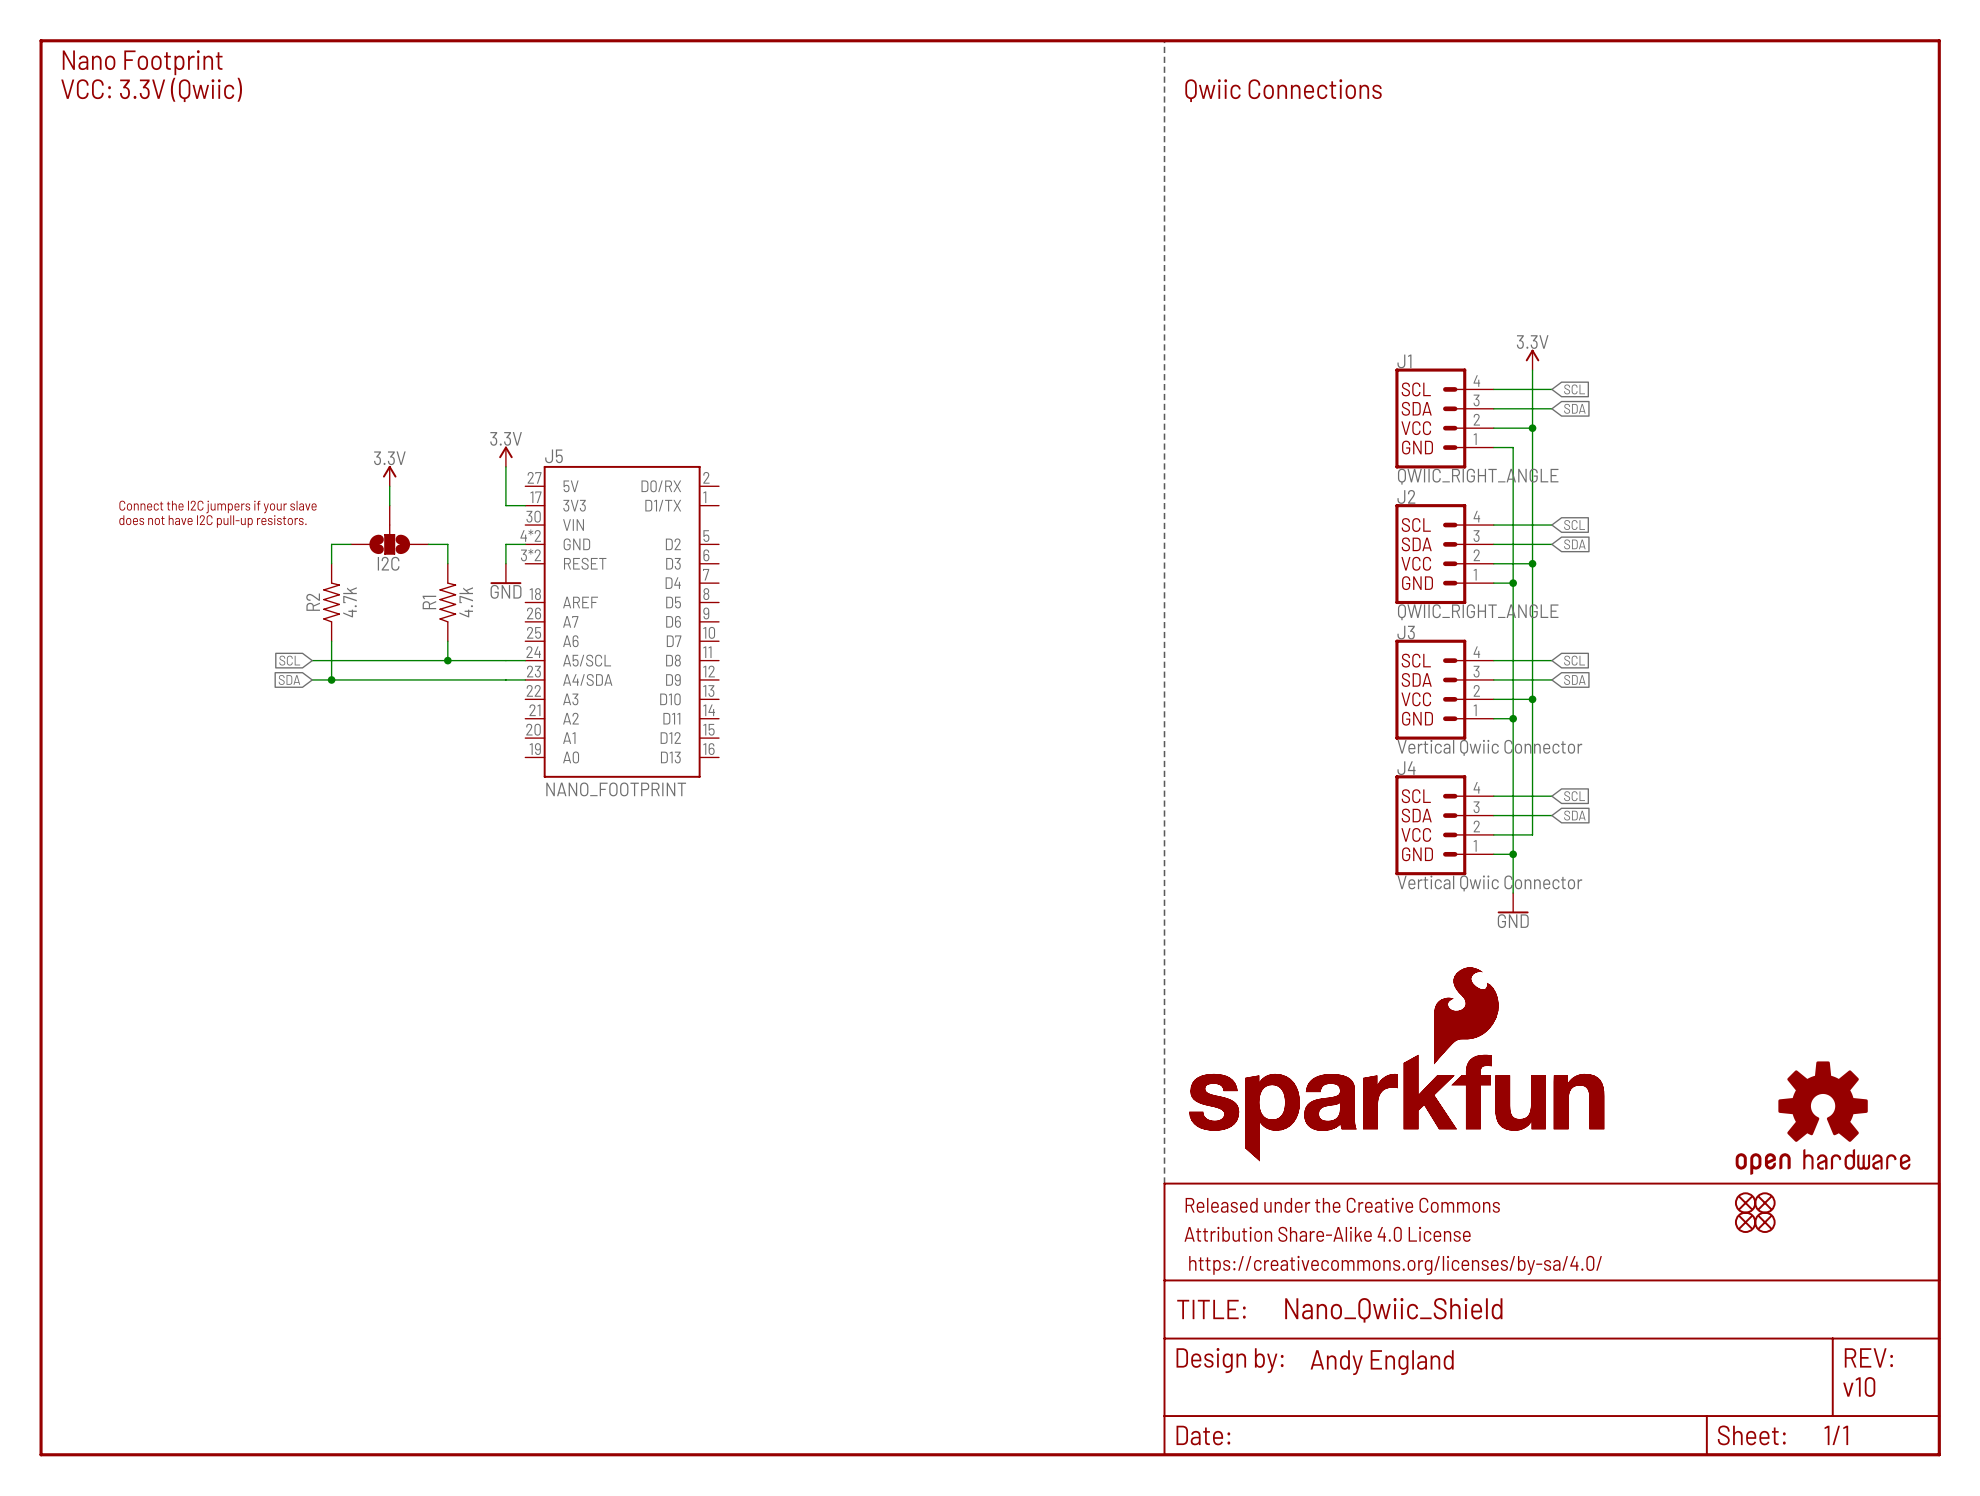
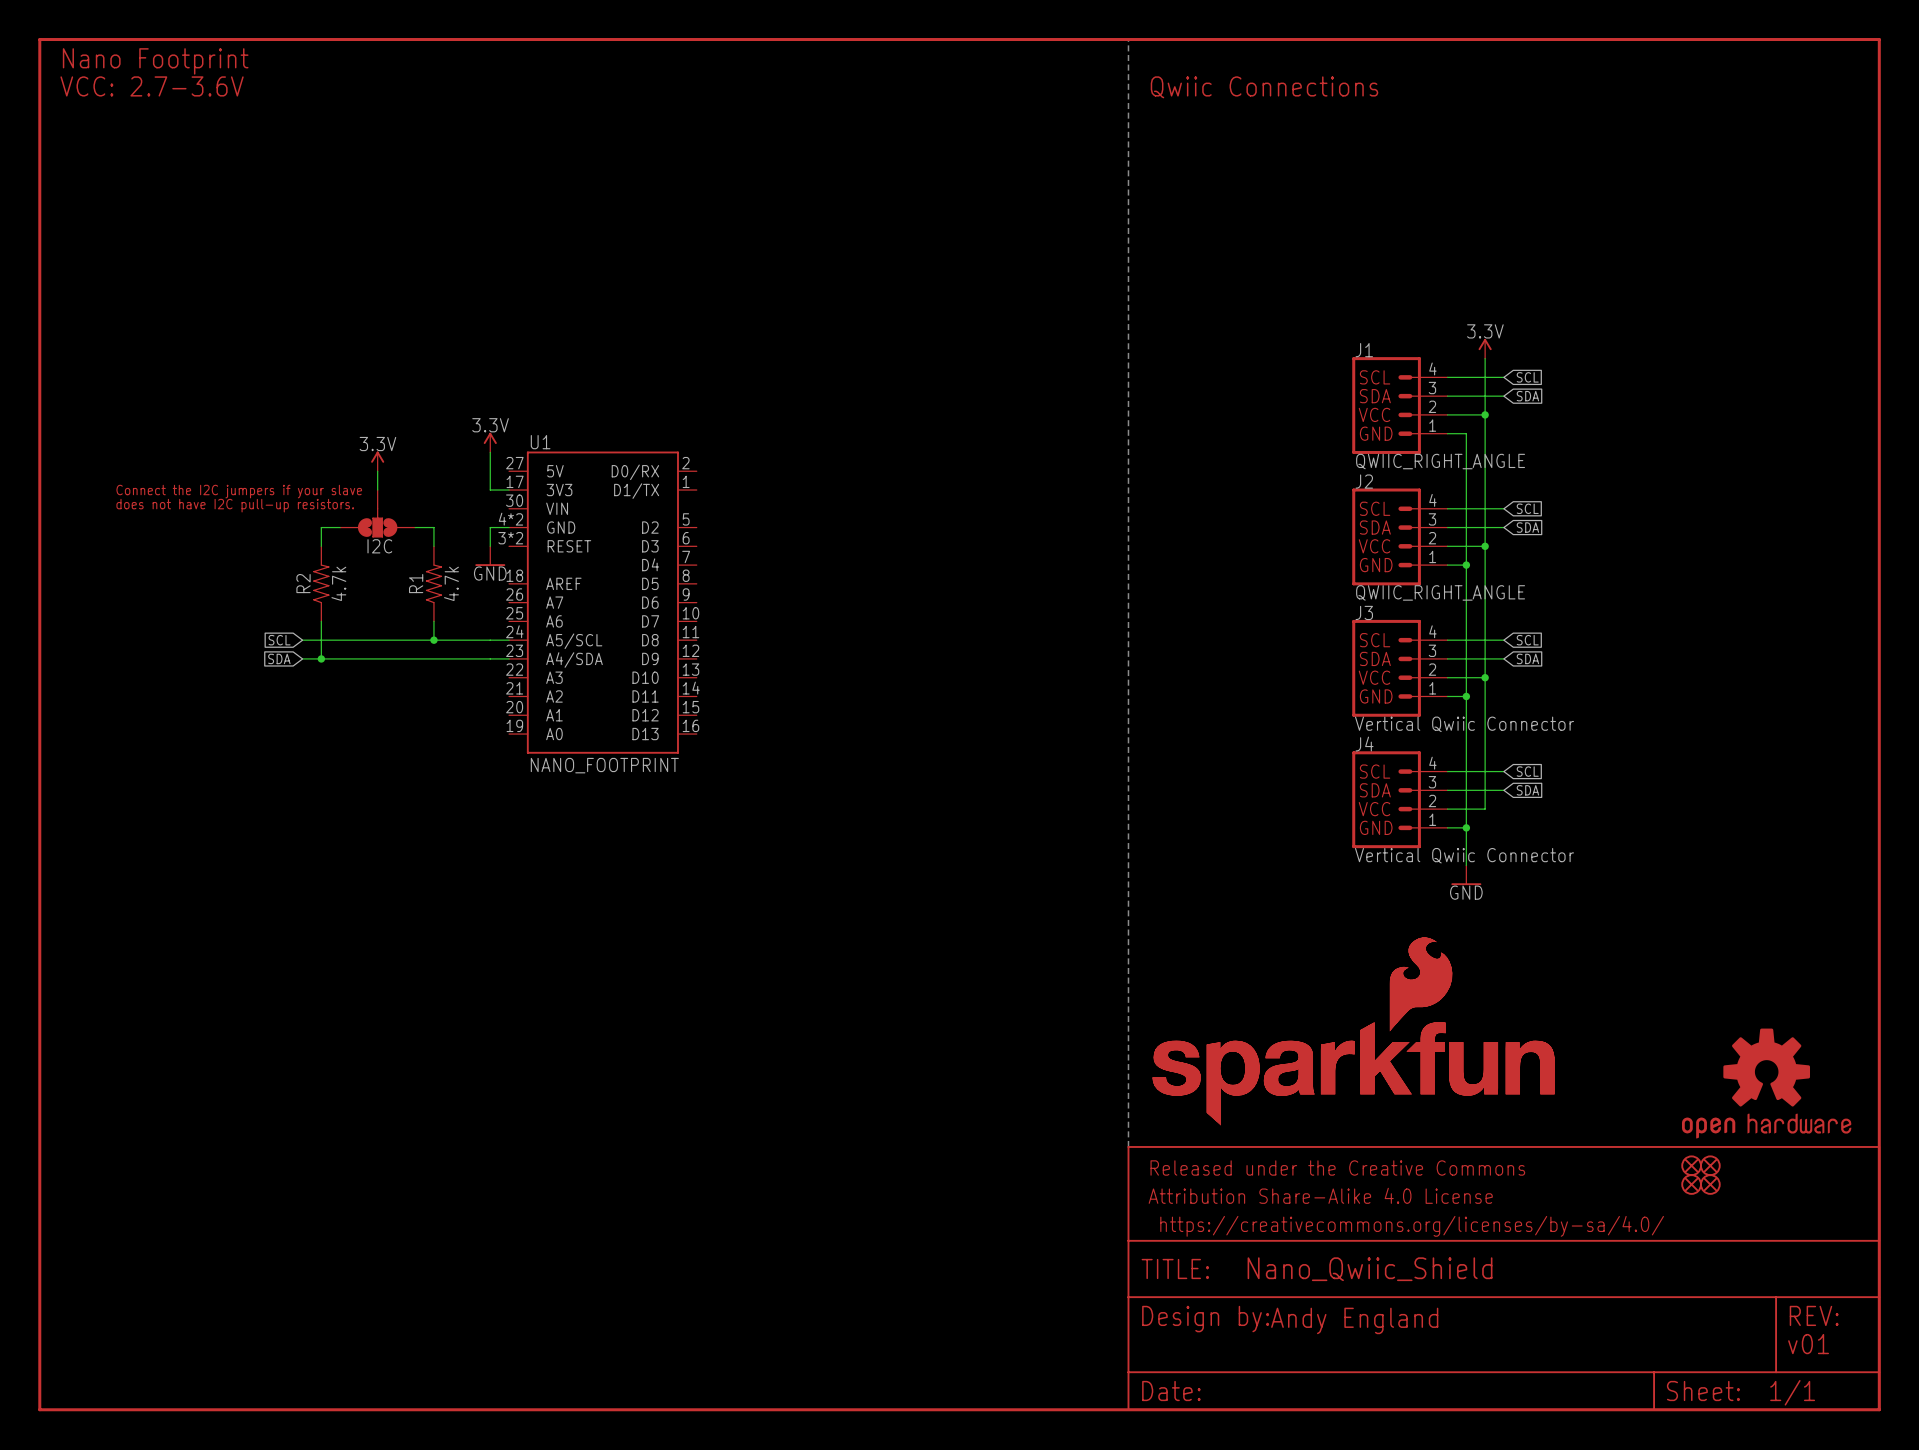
text: VCC: 3.3V (Qwiic) (151, 89) -> VCC: 2.7-3.6V (152, 86)
J5 name: J5 (553, 456) -> U1 (540, 442)
text: v10 (1859, 1386) -> v01 (1808, 1344)

